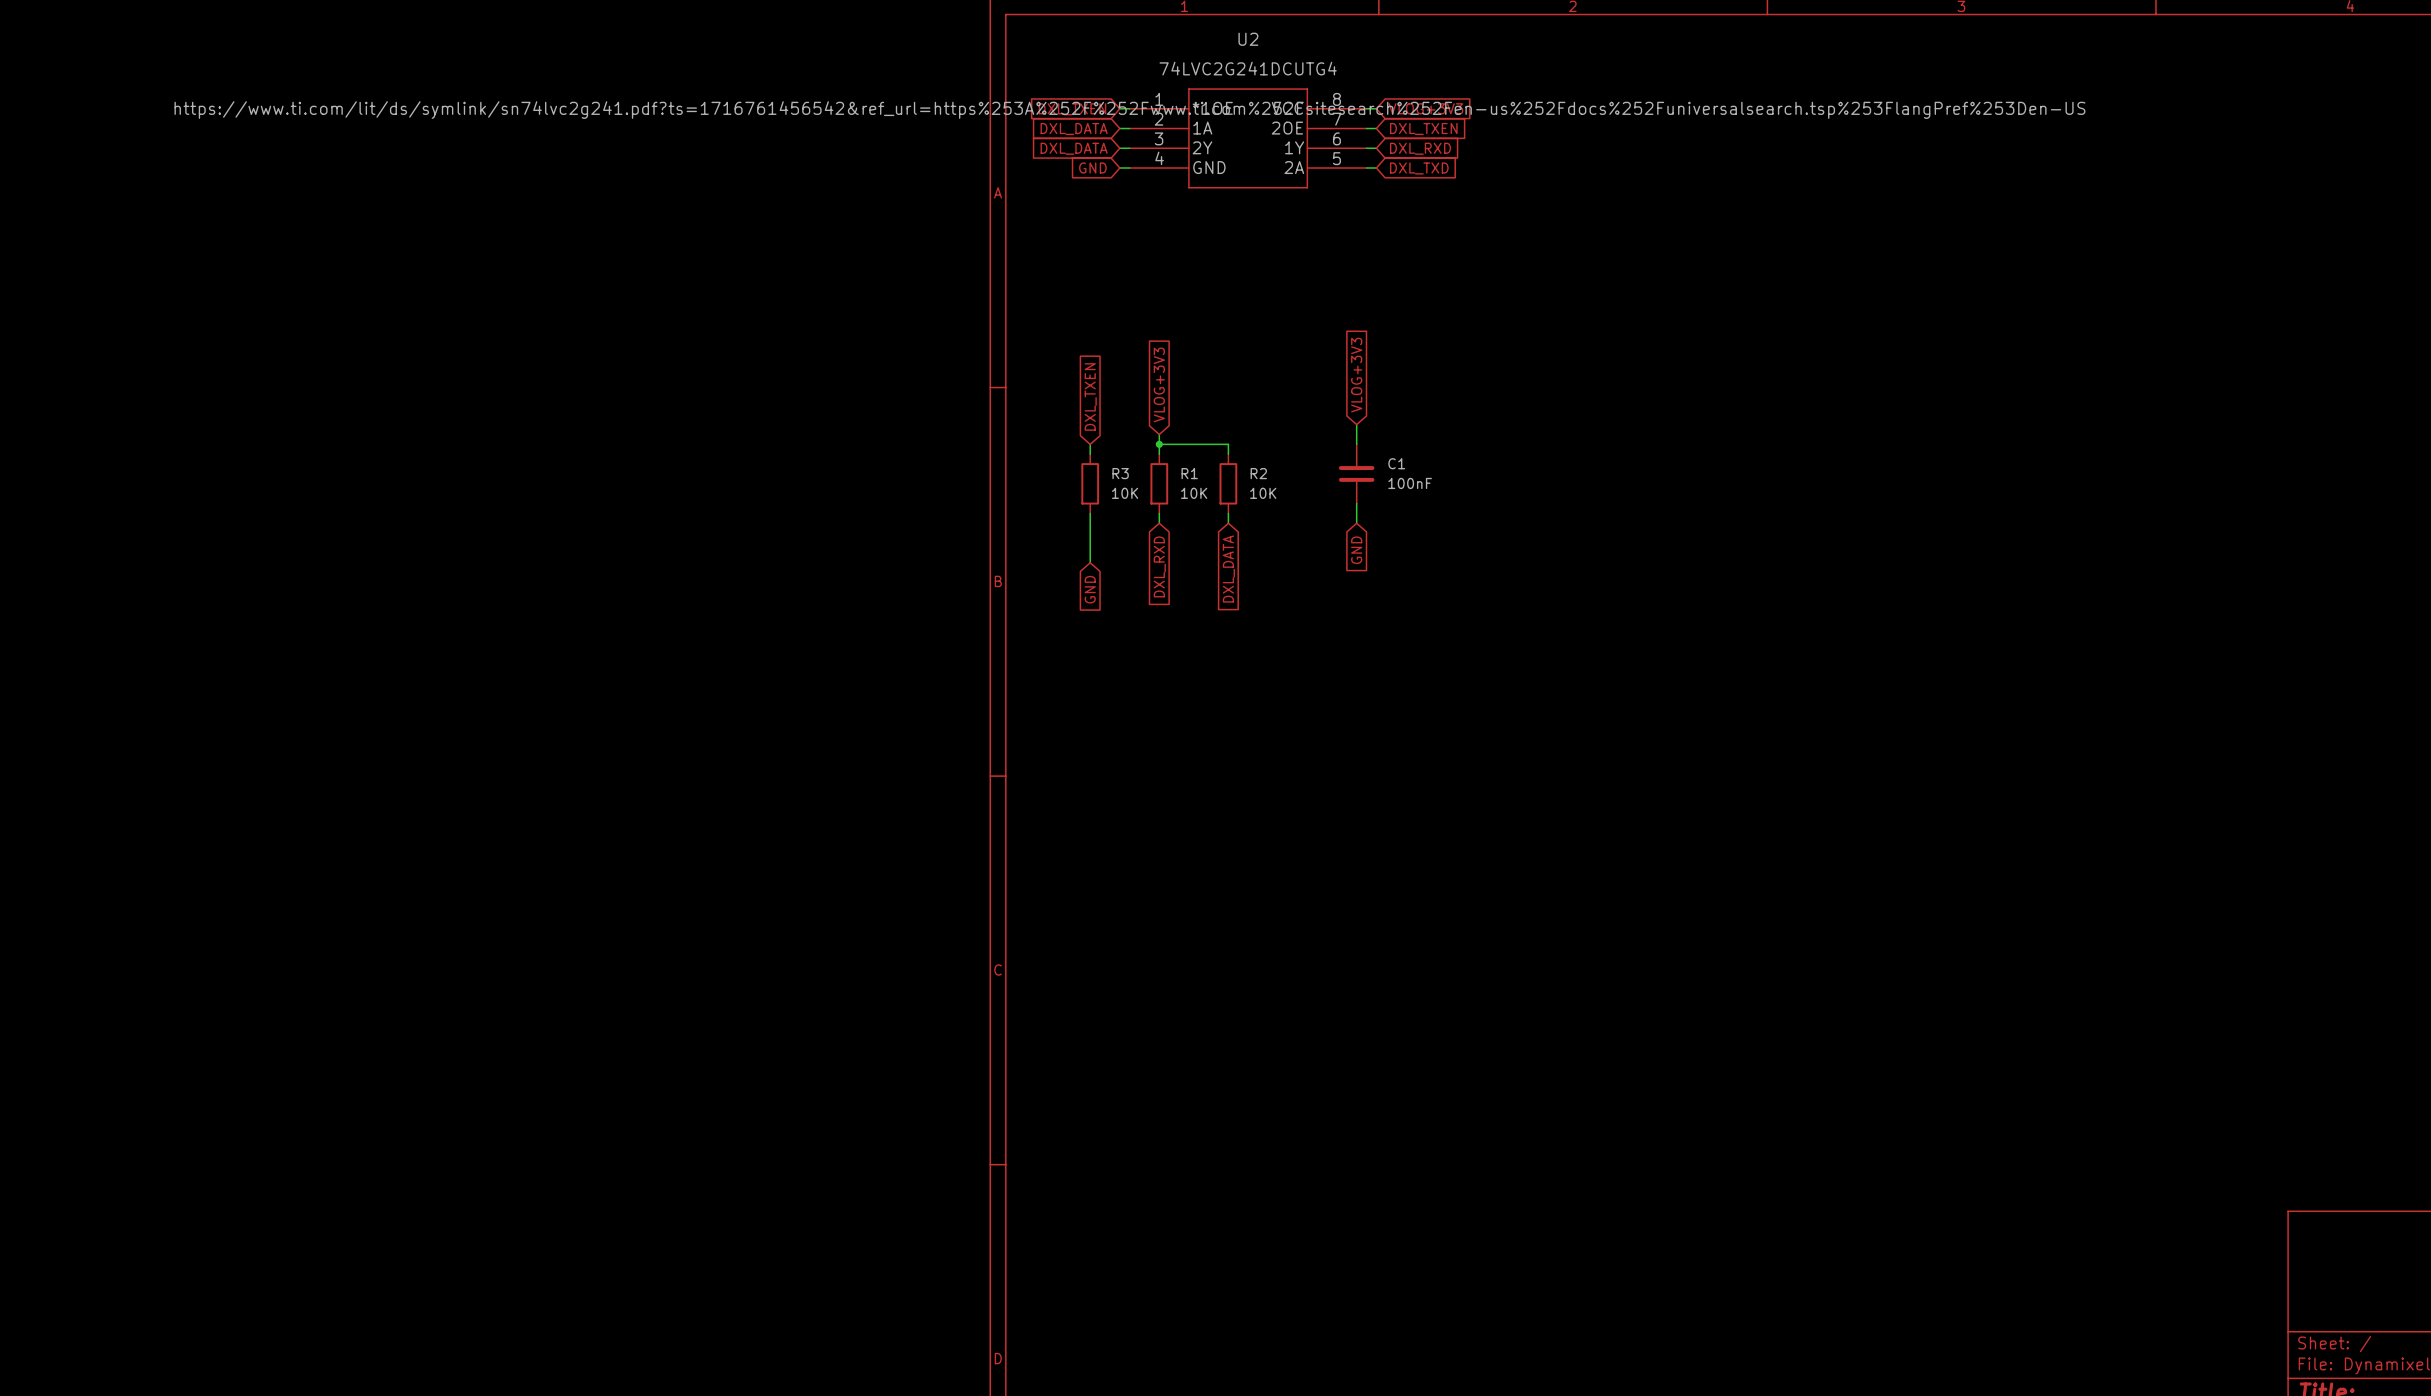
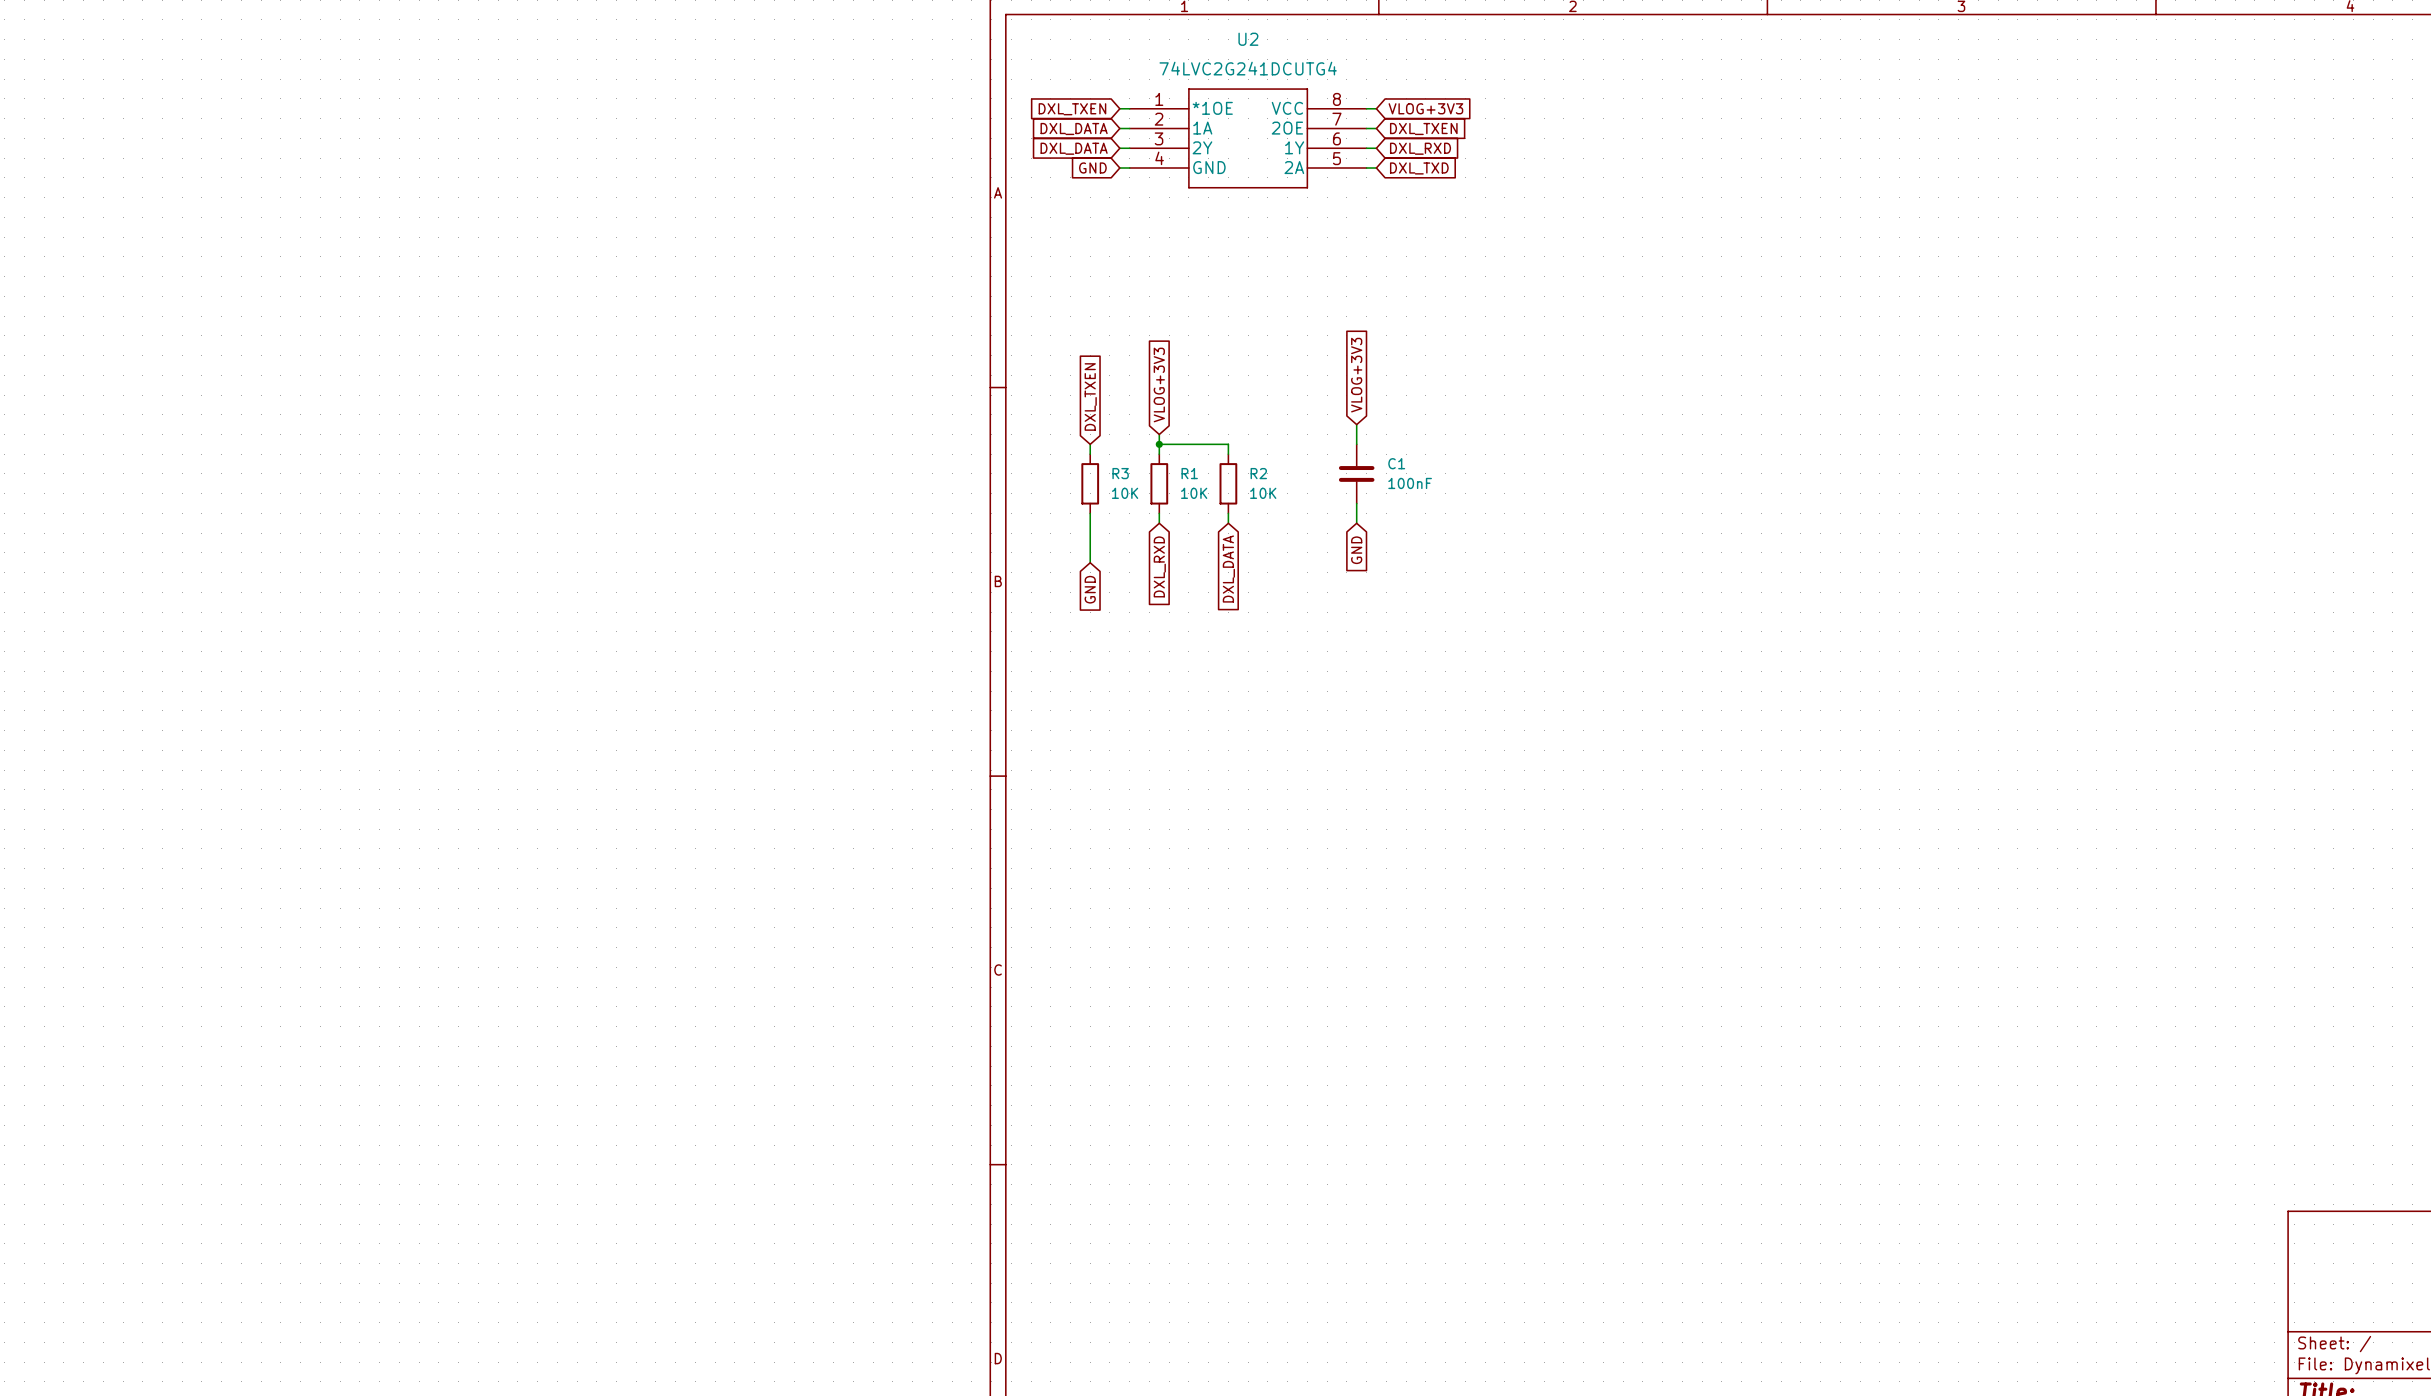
U2 text: https://www.ti.com/lit/ds/symlink/sn74lvc2g241.pdf?ts=1716761456542&ref_url=https%253A%252F%252Fwww.ti.com%252Fsitesearch%252Fen-us%252Fdocs%252Funiversalsearch.tsp%253FlangPref%253Den-US (1129, 110) -> none

